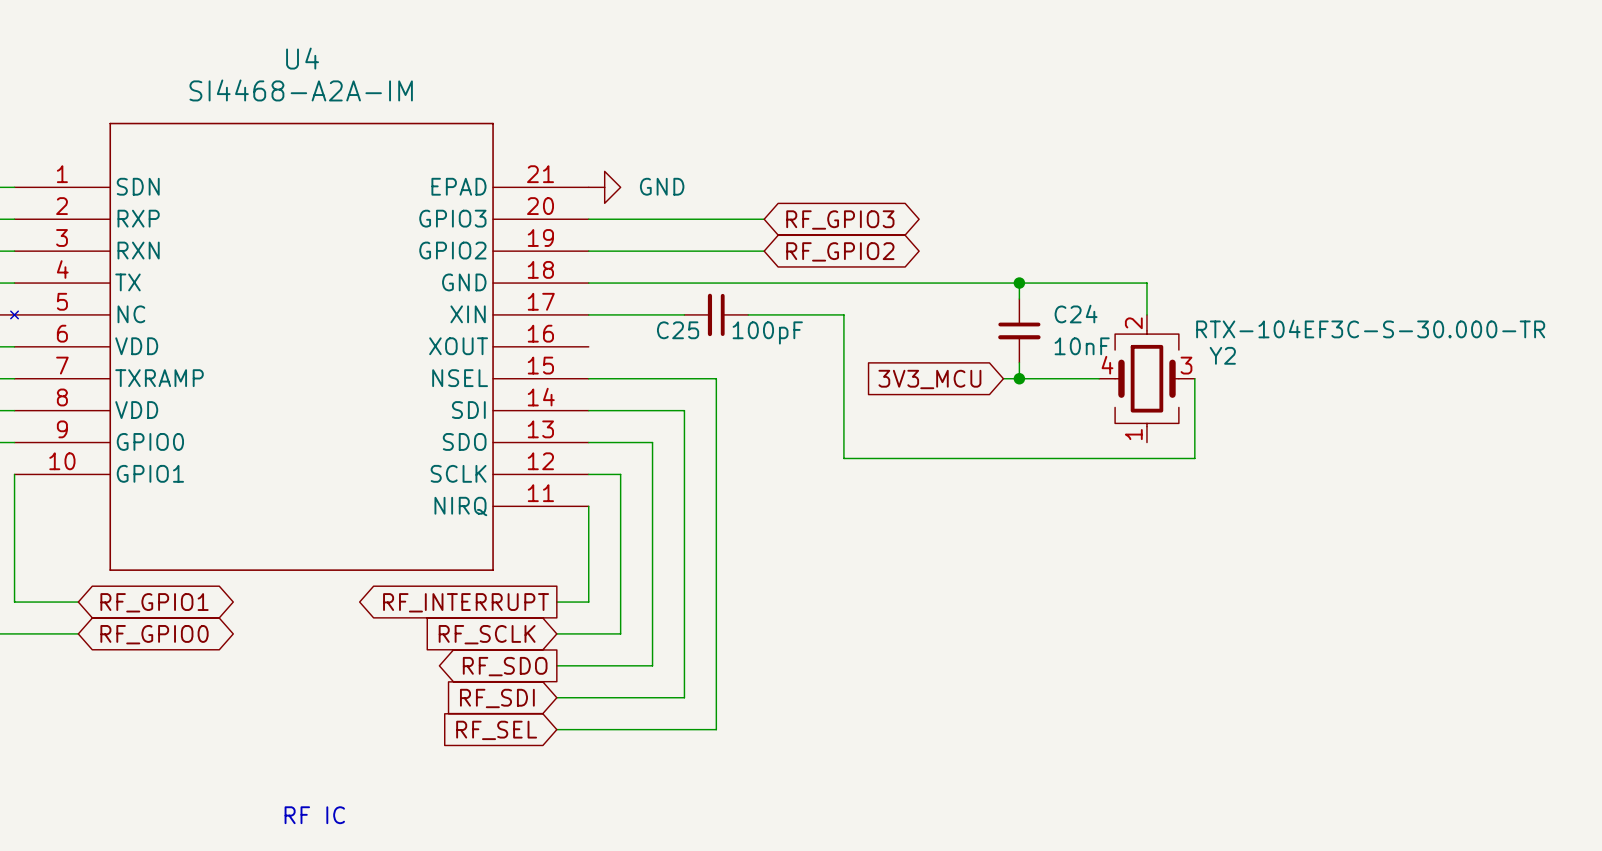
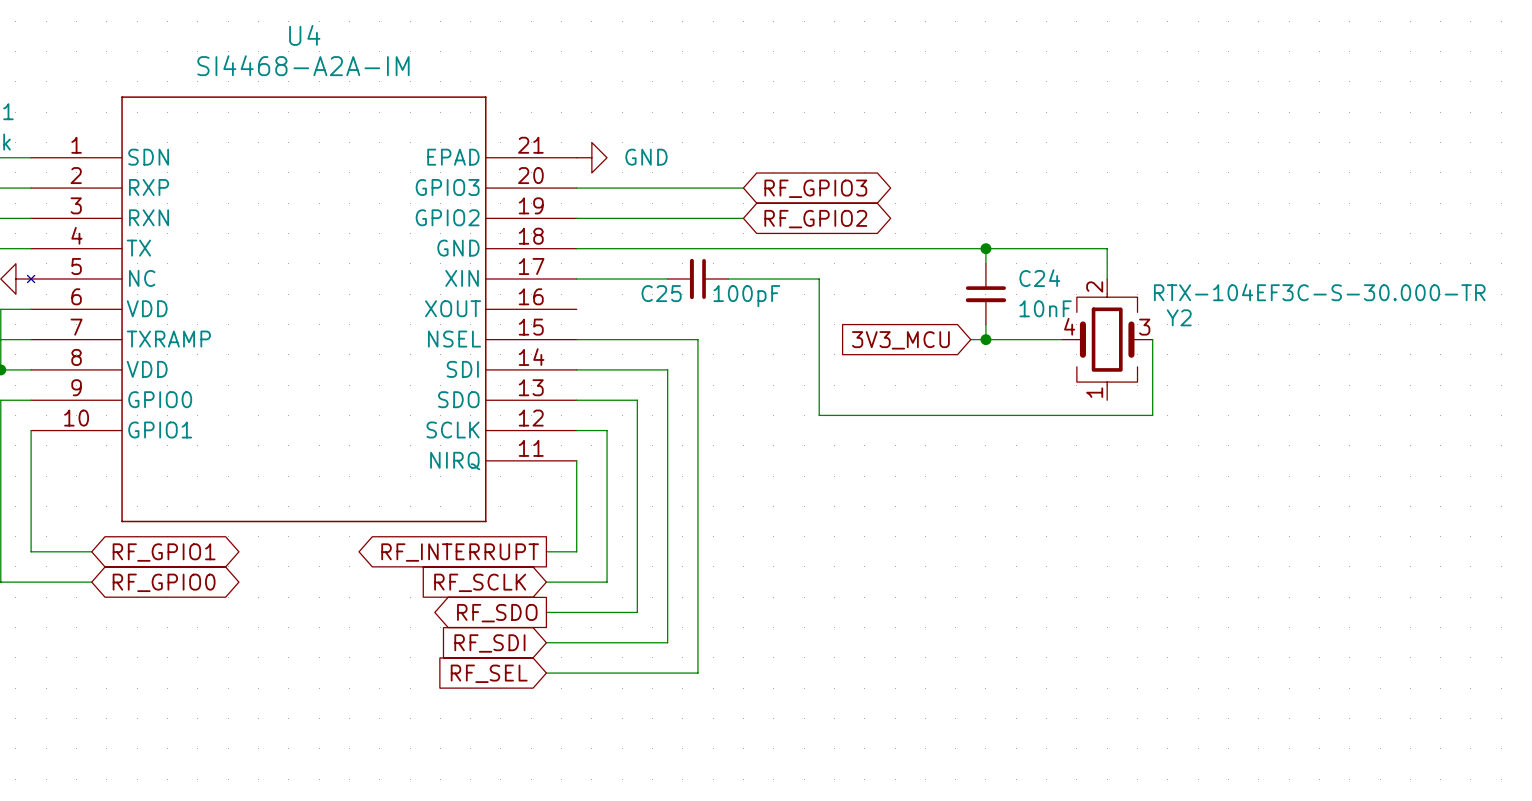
text: RF IC (314, 815) -> none

